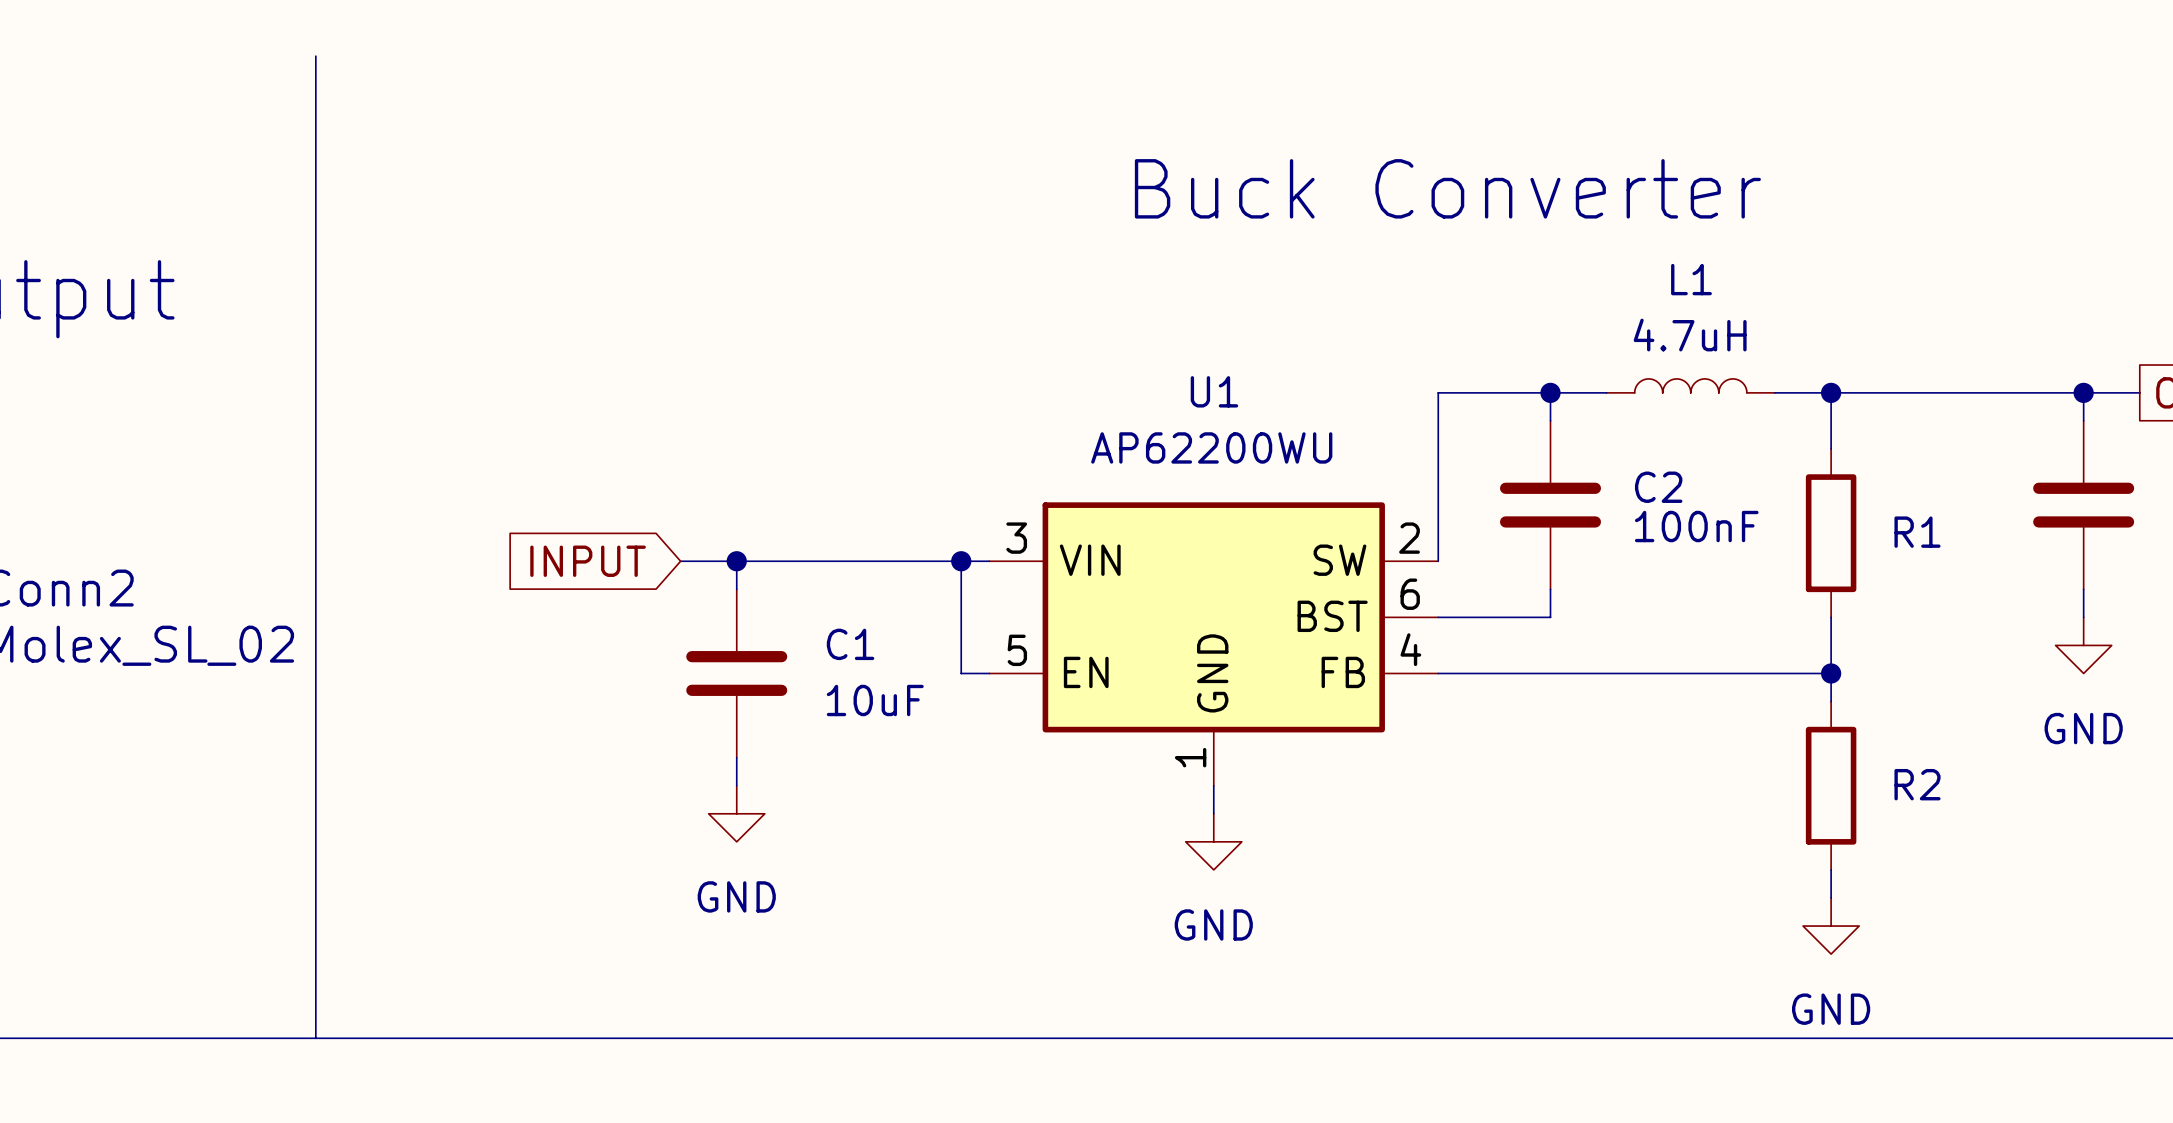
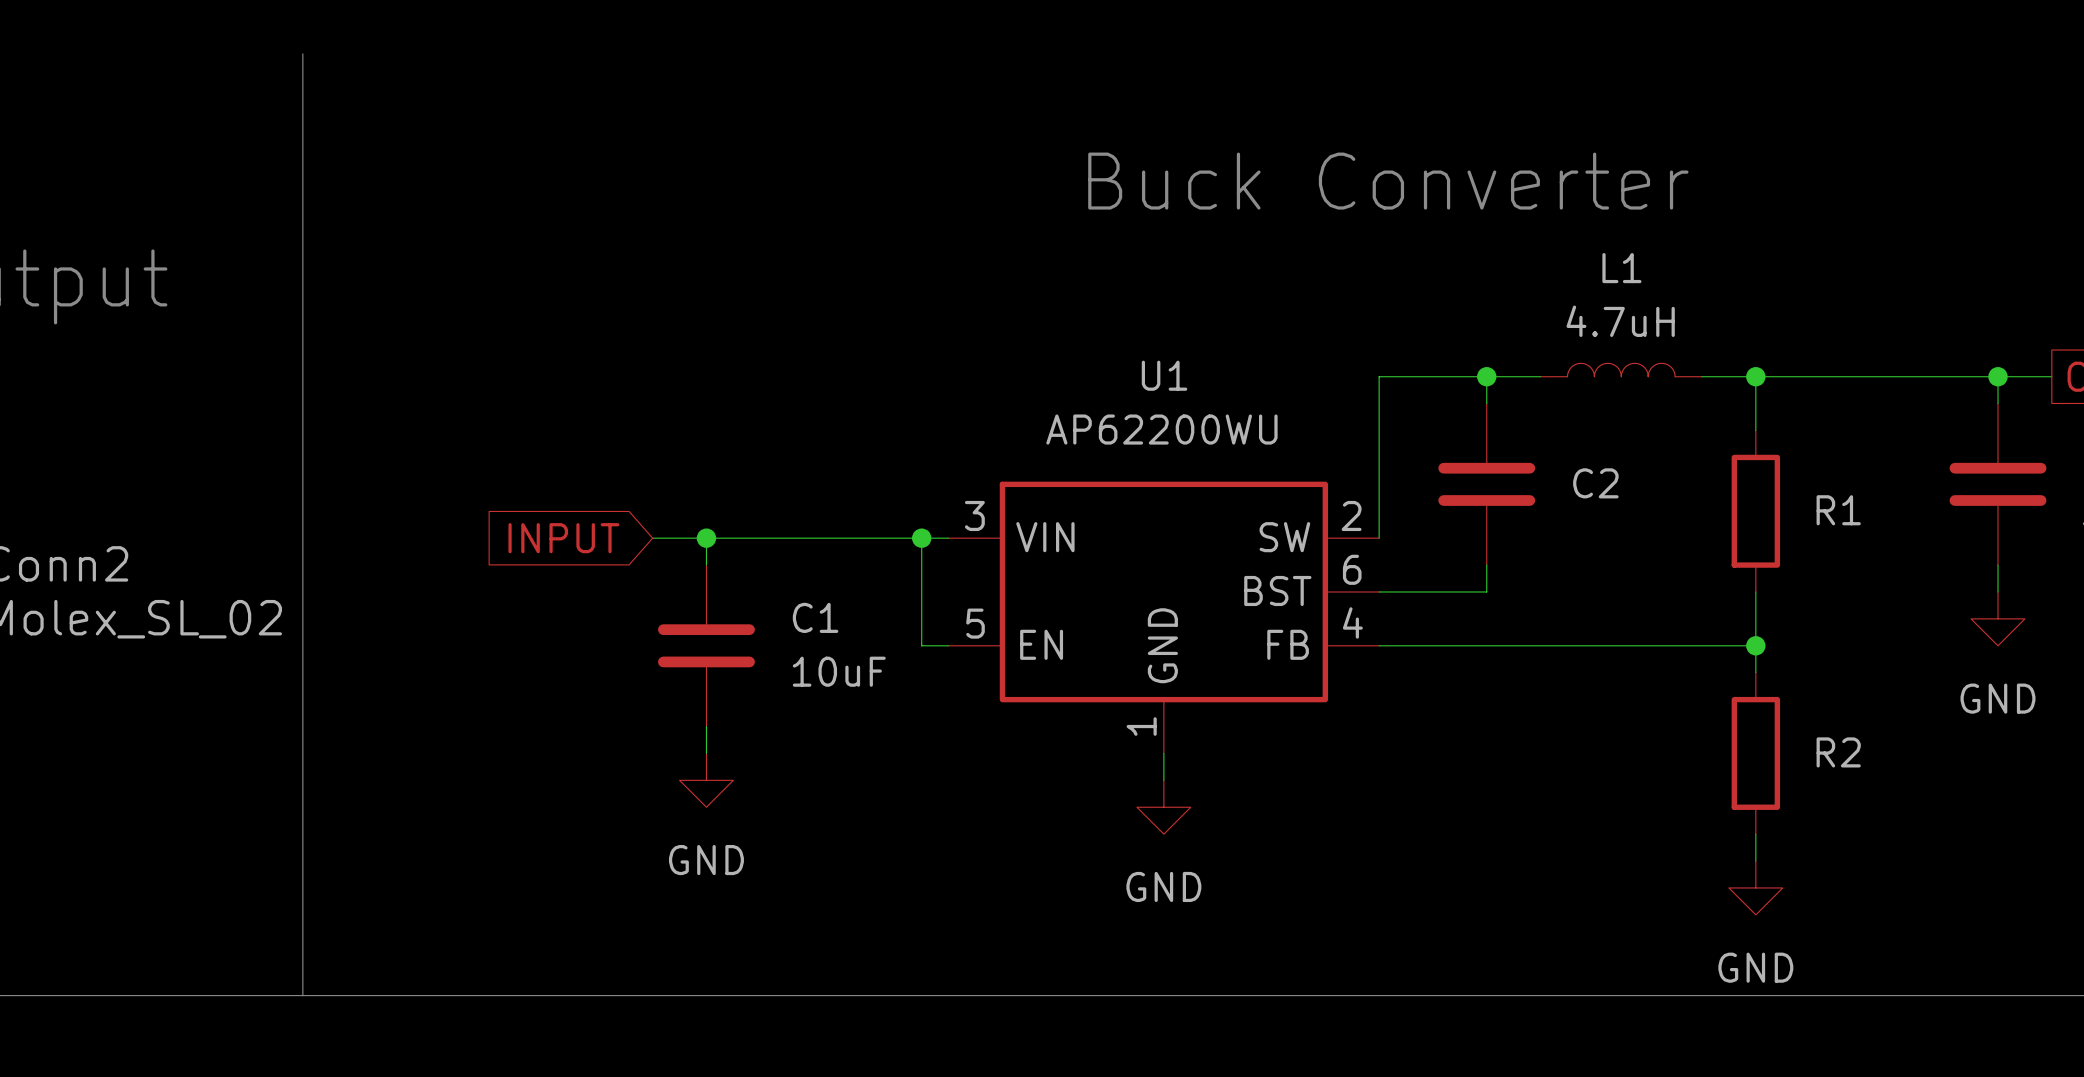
C2 name position: C2 (1658, 487) -> C2 (1595, 483)
C2 value: 100nF (1696, 526) -> none

